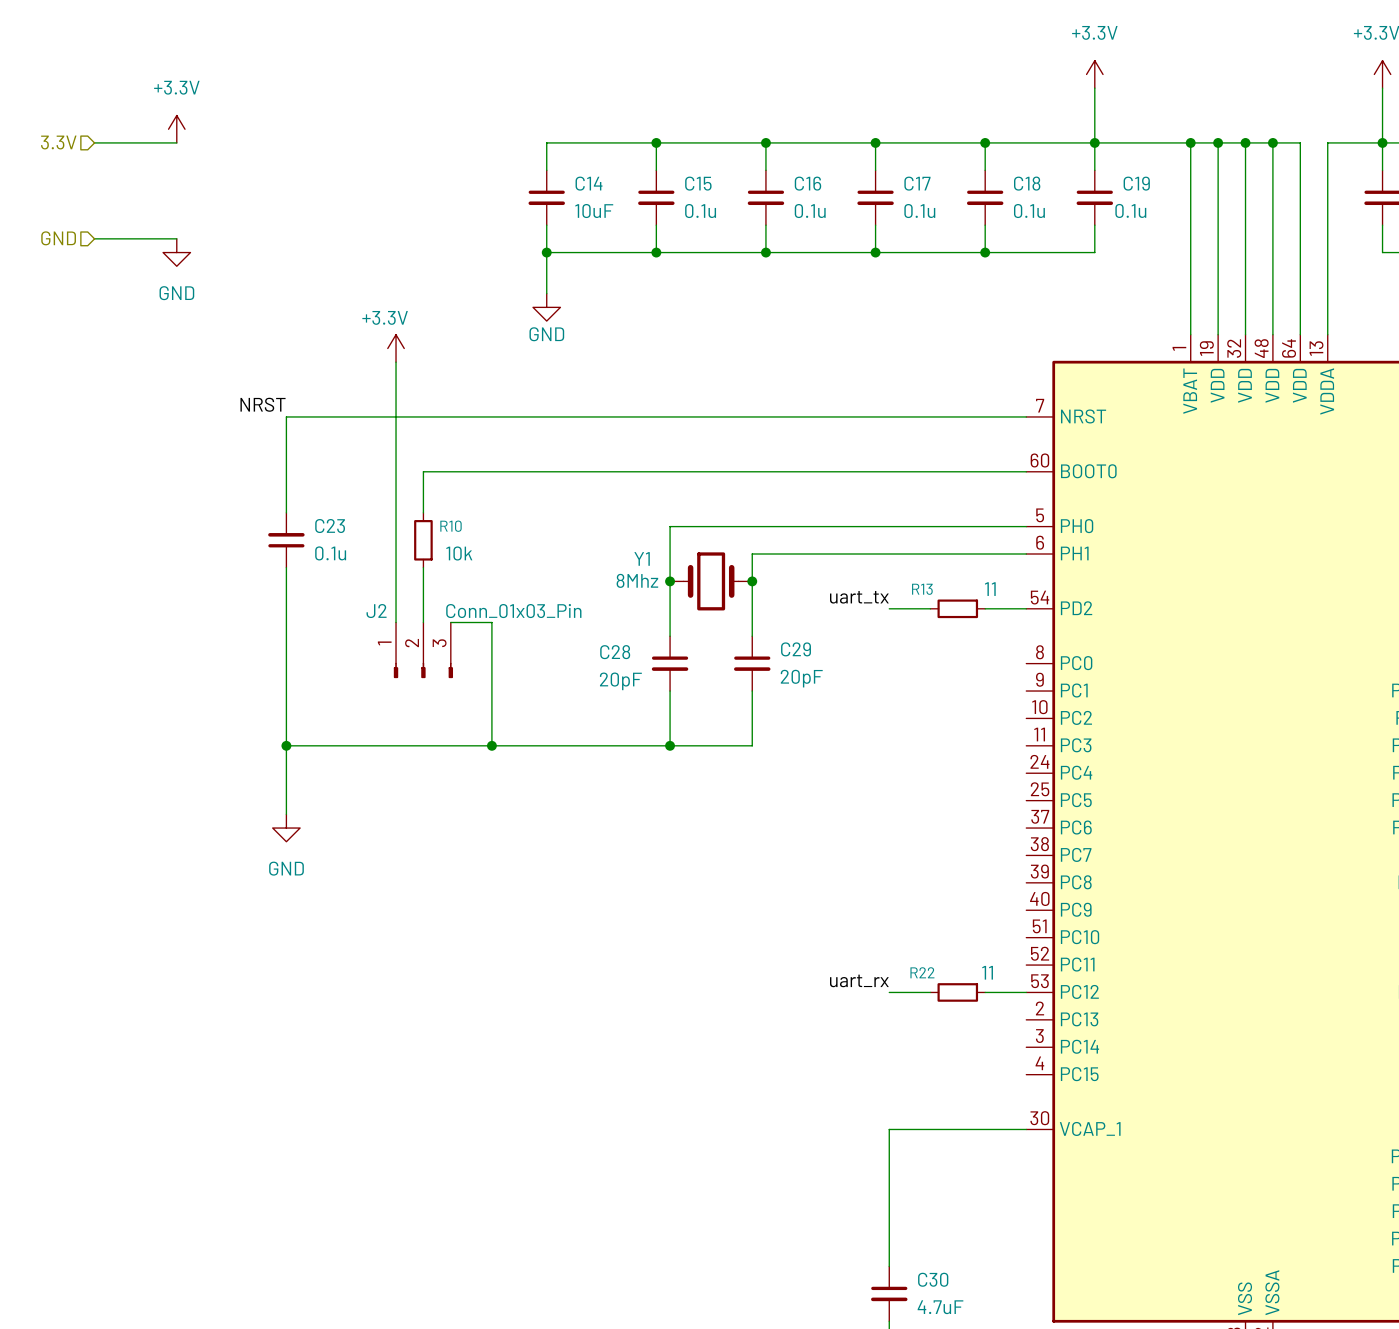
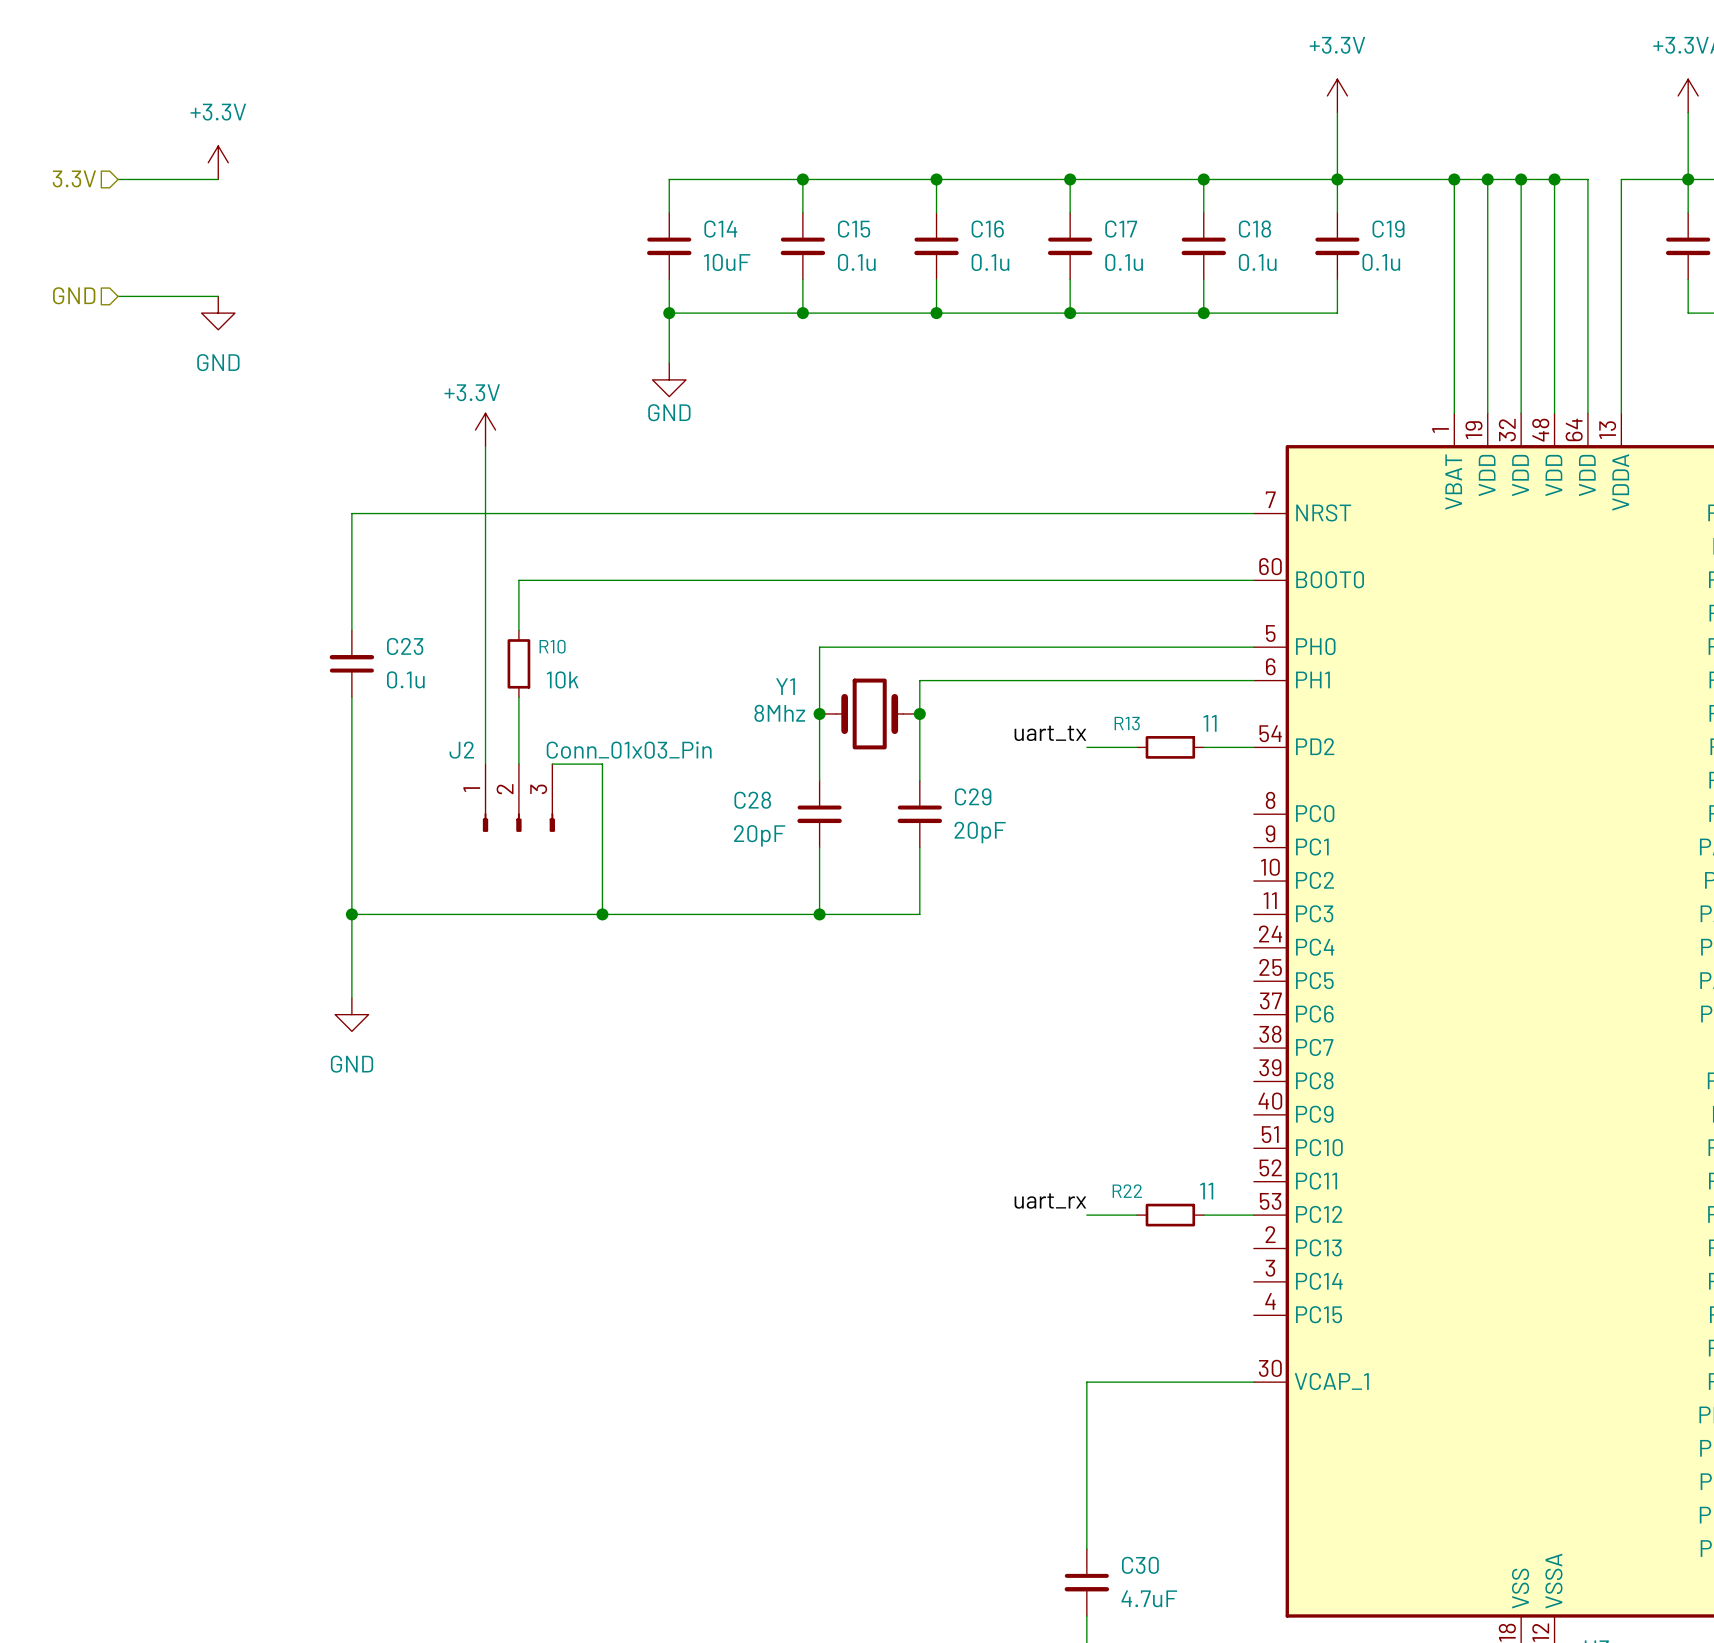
label: NRST (263, 404) -> none

